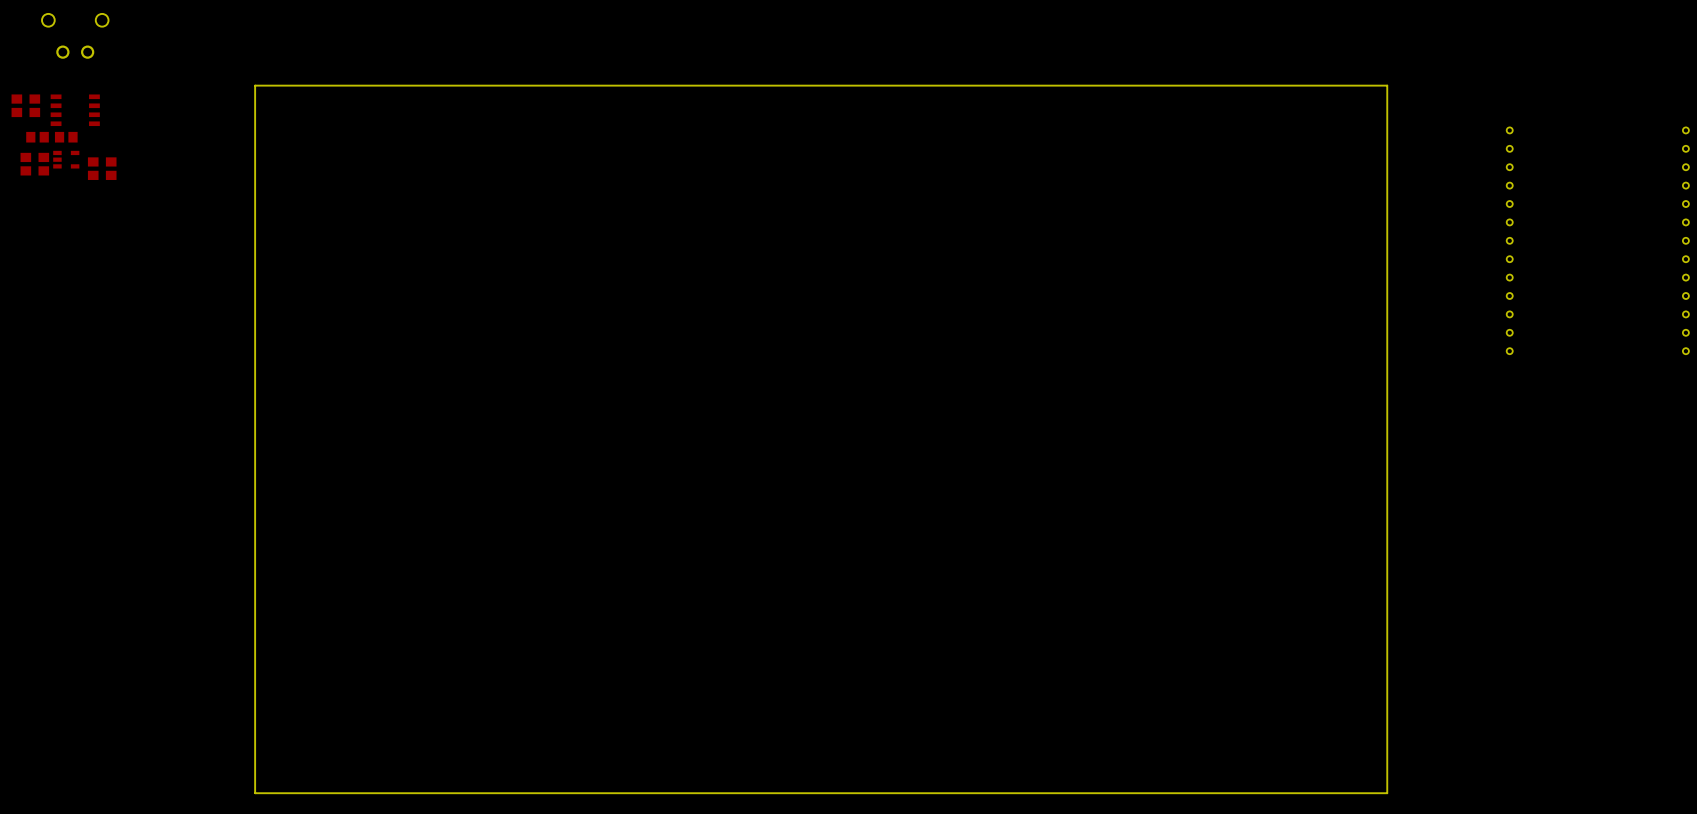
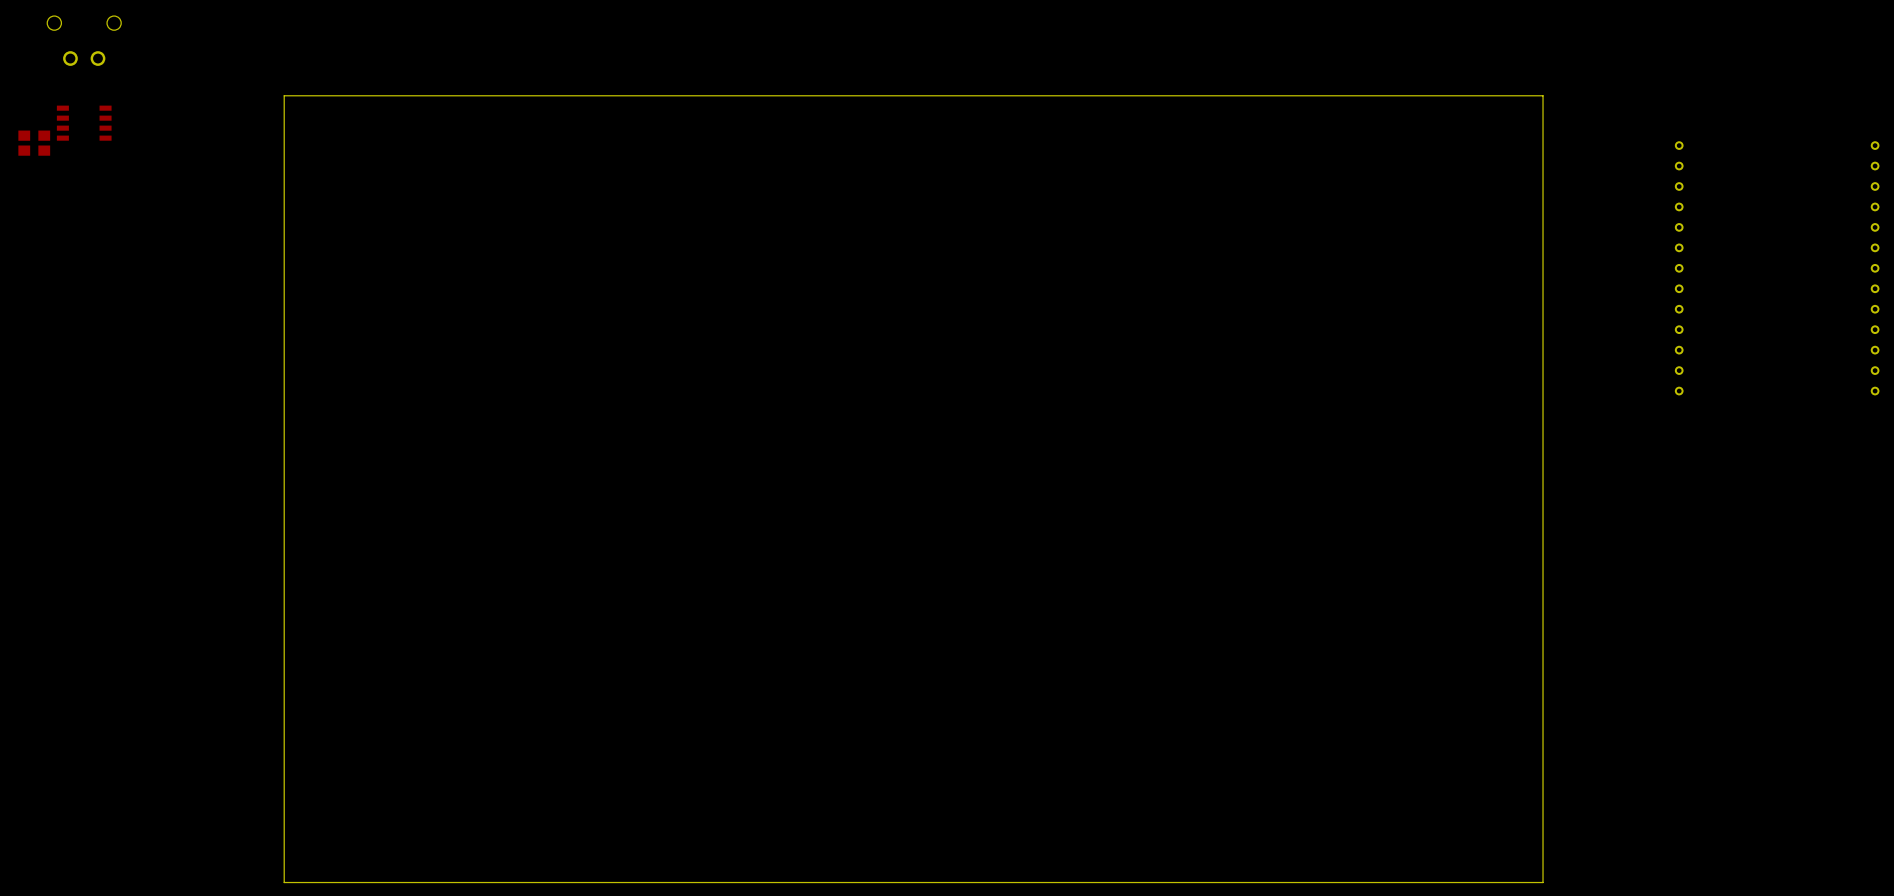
part: (16, 105) -> none
part: (34, 105) -> none
part: none -> (24, 143)
part rotation: 0° (37, 137) -> 90° clockwise (44, 143)
part: (66, 137) -> none
part: (66, 159) -> none
part: (25, 164) -> none
part: (43, 164) -> none
part: (93, 168) -> none
part: (111, 168) -> none

